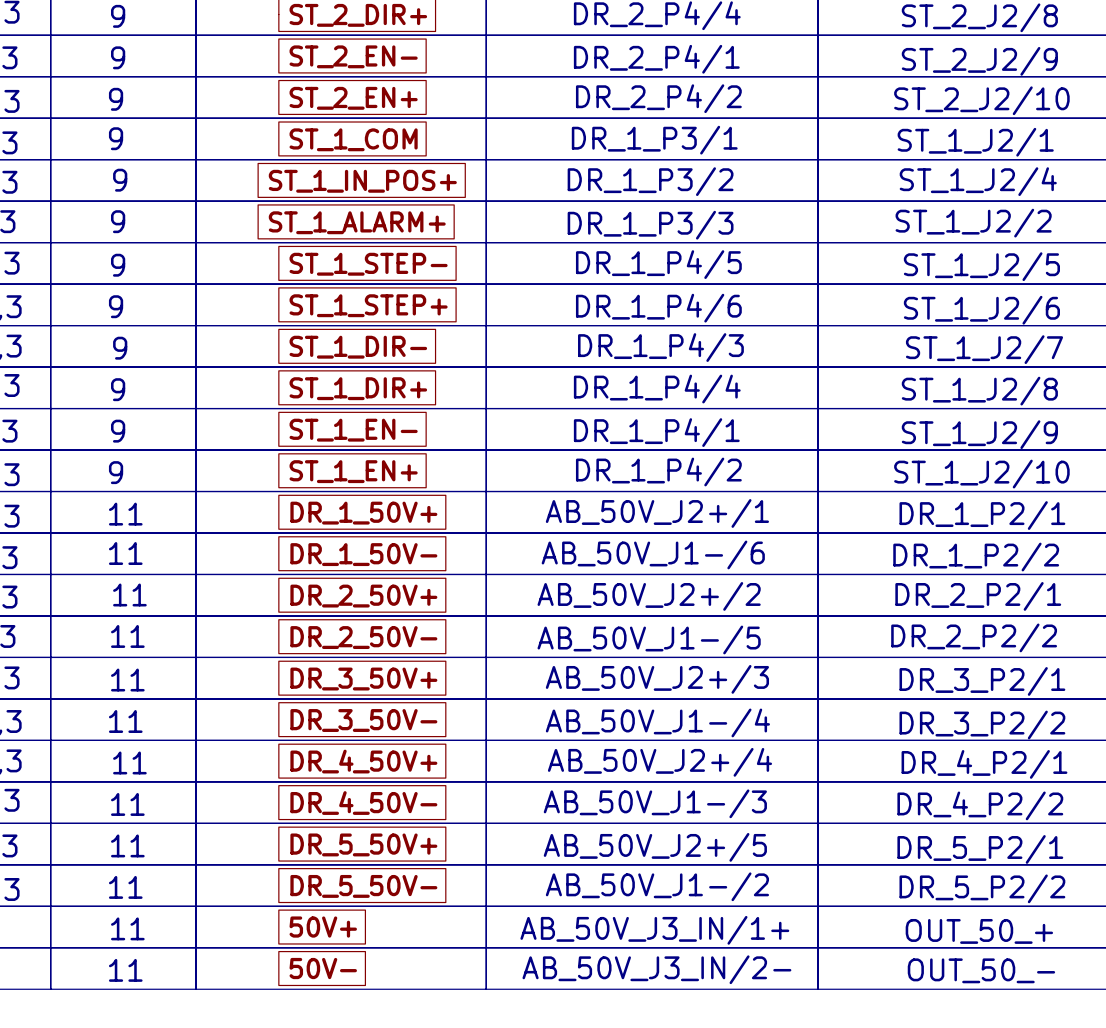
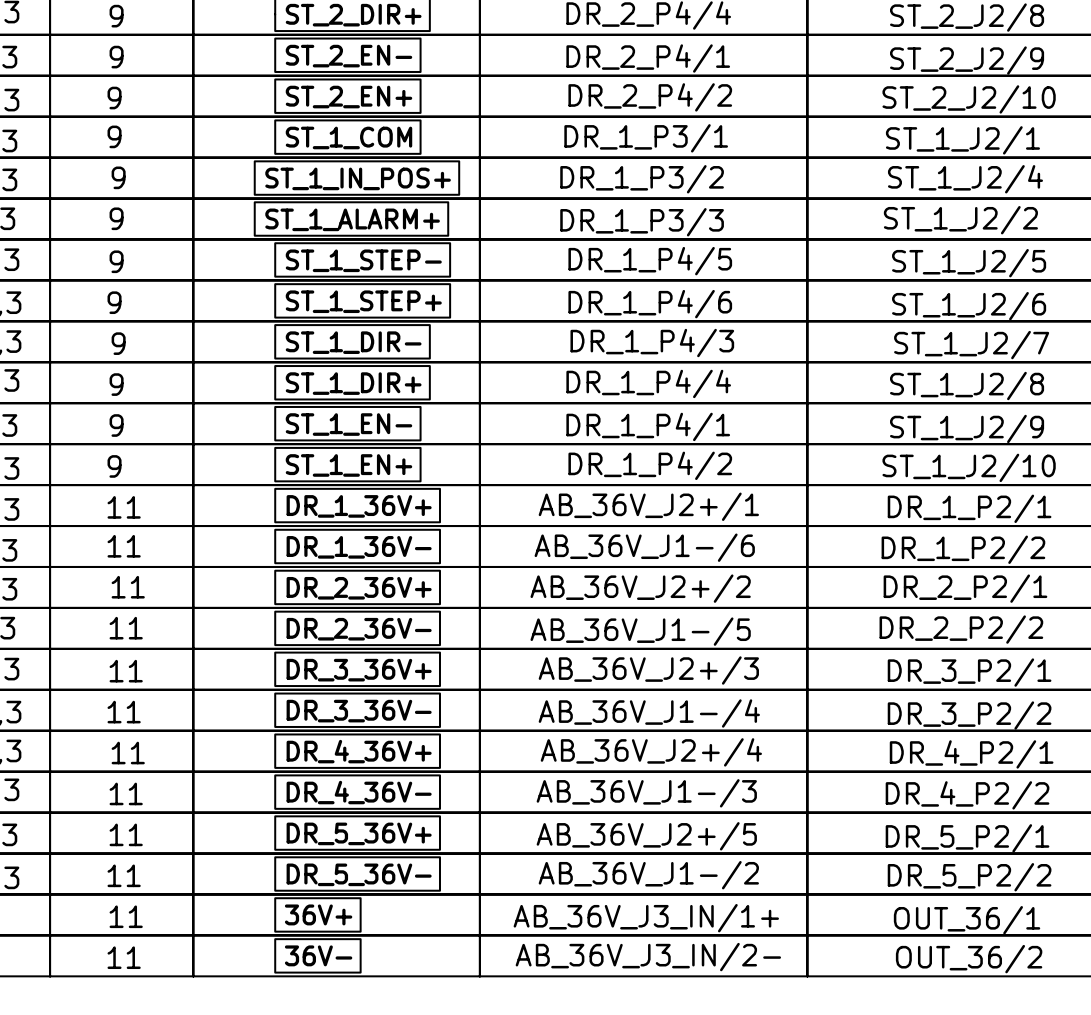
global label: DR_1_50V+ (363, 513) -> DR_1_36V+ (359, 506)
text: AB_50V_J2+/1 (657, 513) -> AB_36V_J2+/1 (648, 506)
global label: DR_1_50V- (363, 554) -> DR_1_36V- (359, 547)
text: AB_50V_J1-/6 (653, 554) -> AB_36V_J1-/6 (644, 547)
global label: DR_2_50V+ (363, 596) -> DR_2_36V+ (359, 588)
text: AB_50V_J2+/2 (649, 596) -> AB_36V_J2+/2 (640, 588)
global label: DR_2_50V- (363, 637) -> DR_2_36V- (359, 629)
text: AB_50V_J1-/5 (649, 639) -> AB_36V_J1-/5 (640, 631)
global label: DR_3_50V+ (363, 679) -> DR_3_36V+ (359, 670)
text: AB_50V_J2+/3 (657, 679) -> AB_36V_J2+/3 (648, 670)
global label: DR_3_50V- (363, 720) -> DR_3_36V- (359, 711)
text: AB_50V_J1-/4 (657, 722) -> AB_36V_J1-/4 (649, 713)
global label: DR_4_50V+ (363, 761) -> DR_4_36V+ (359, 751)
text: AB_50V_J2+/4 (659, 762) -> AB_36V_J2+/4 (651, 752)
global label: DR_4_50V- (363, 803) -> DR_4_36V- (359, 792)
text: AB_50V_J1-/3 (655, 803) -> AB_36V_J1-/3 (646, 793)
global label: DR_5_50V+ (363, 844) -> DR_5_36V+ (359, 833)
text: AB_50V_J2+/5 (655, 847) -> AB_36V_J2+/5 (646, 836)
global label: DR_5_50V- (363, 886) -> DR_5_36V- (359, 874)
text: AB_50V_J1-/2 (657, 886) -> AB_36V_J1-/2 (648, 875)
global label: 50V+ (323, 927) -> 36V+ (318, 914)
text: AB_50V_J3_IN/1+ (654, 930) -> AB_36V_J3_IN/1+ (646, 918)
text: OUT_50_+ (979, 931) -> OUT_36/1 (967, 920)
global label: 50V- (323, 968) -> 36V- (318, 955)
text: AB_50V_J3_IN/2- (656, 969) -> AB_36V_J3_IN/2- (648, 957)
text: OUT_50_- (981, 970) -> OUT_36/2 (969, 959)

